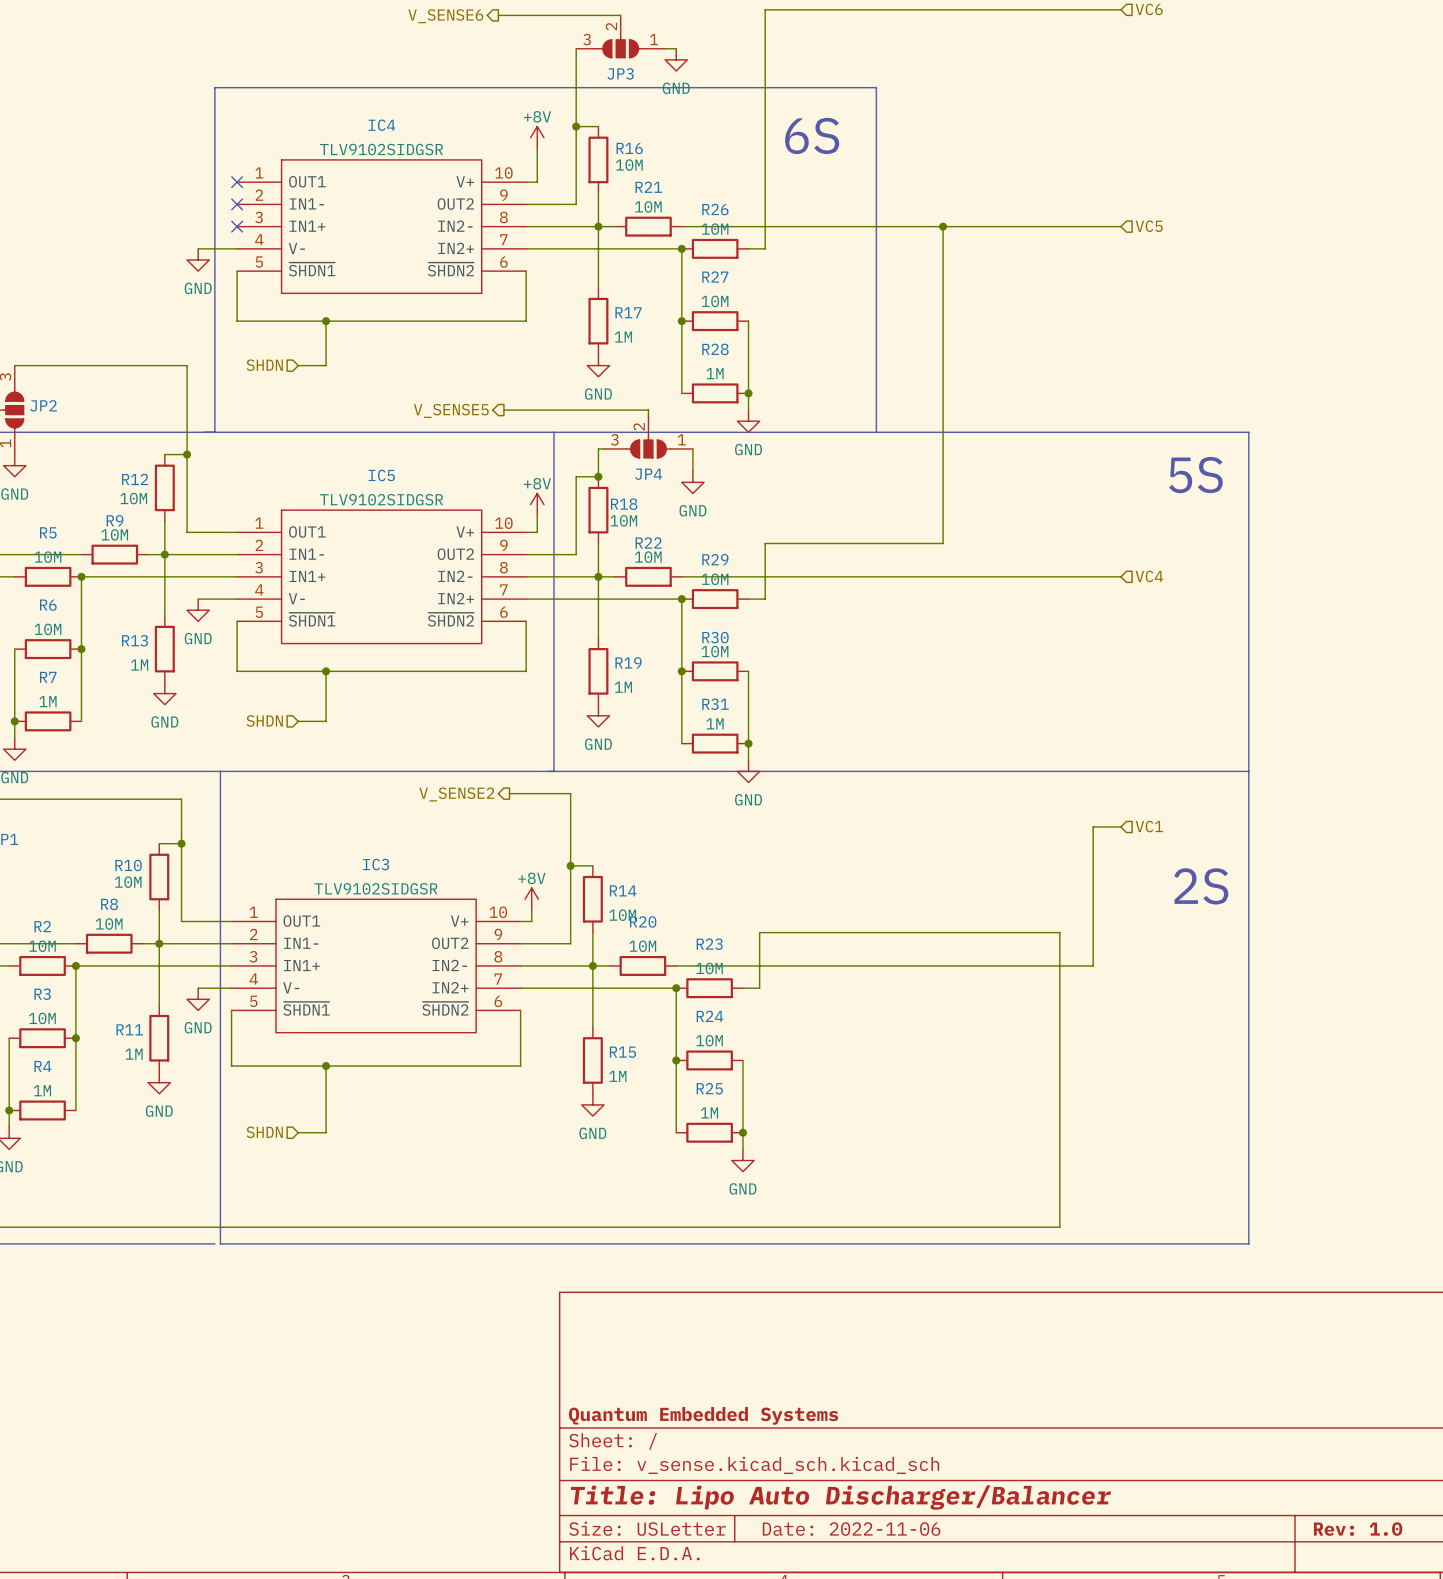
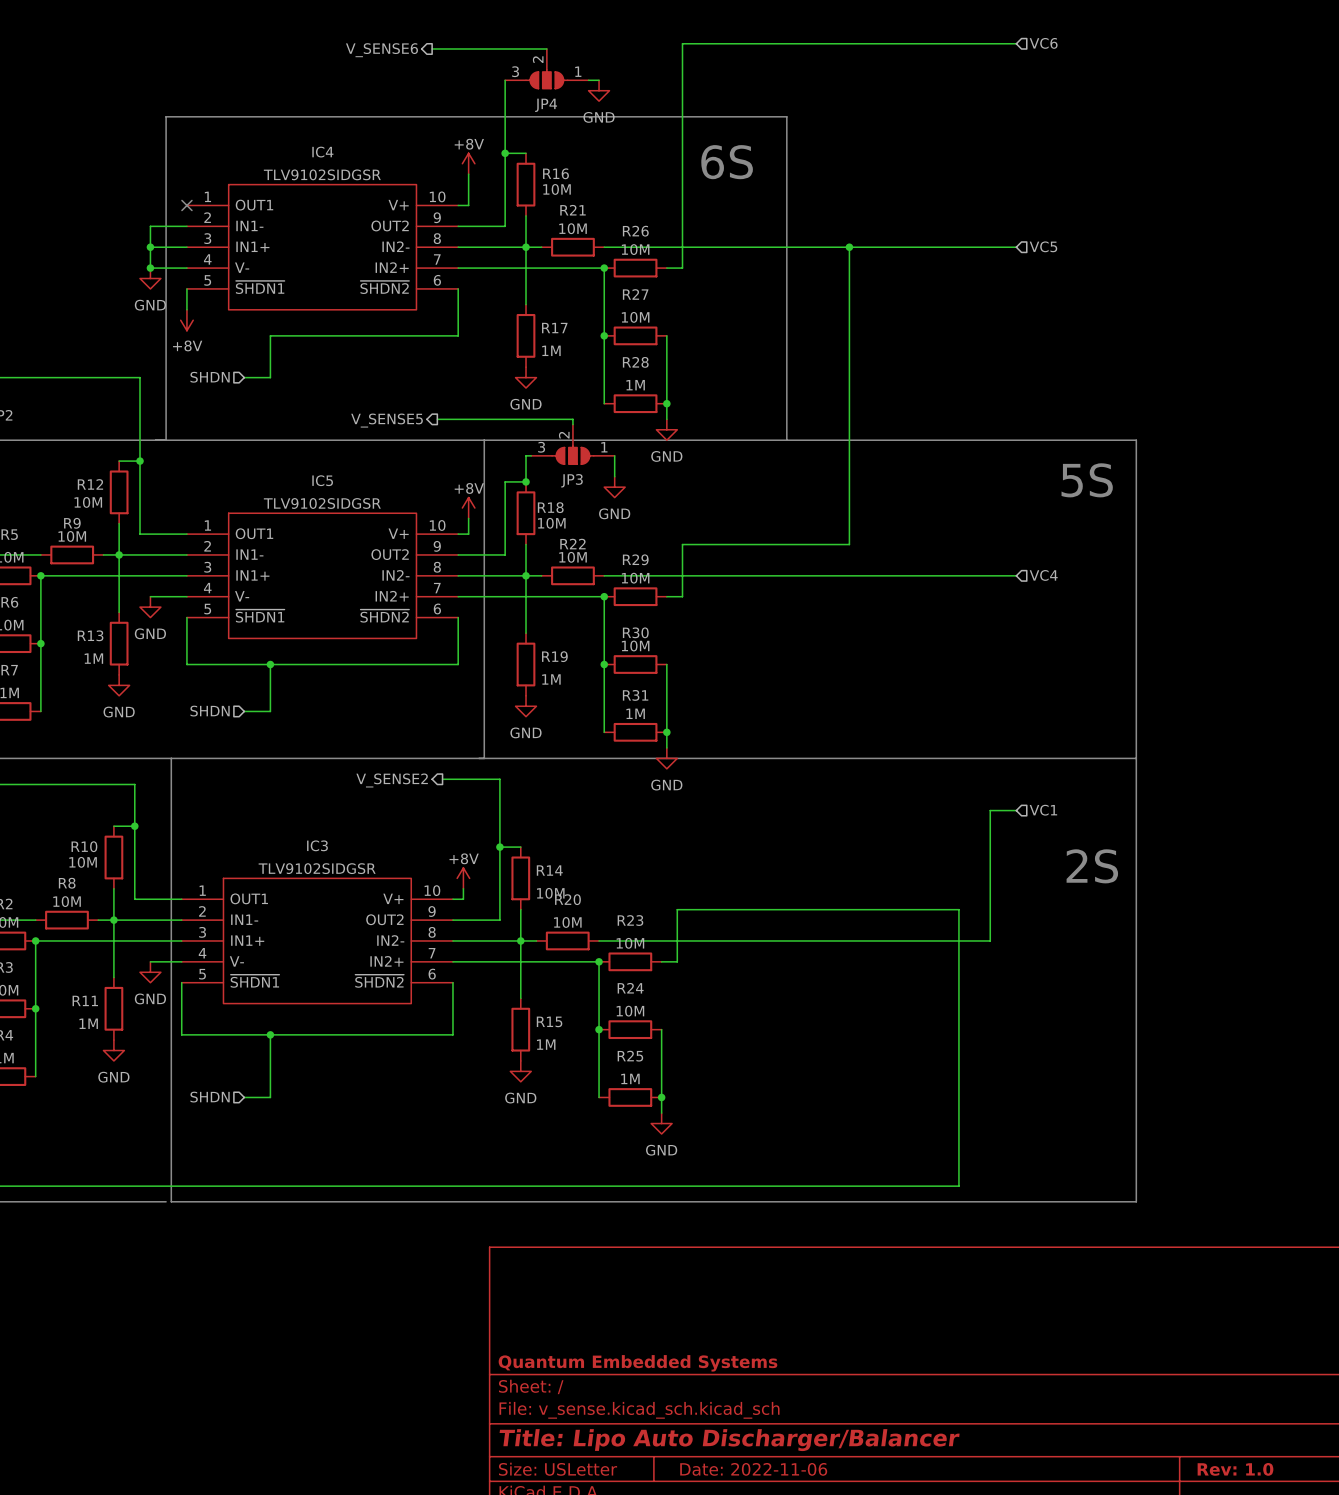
JP3 name: JP3 (620, 73) -> JP4 (546, 105)
wire: none -> (186, 226) (150, 226) (150, 268)
no-connect mark: (237, 204) -> none
wire: none -> (150, 247) (186, 247)
junction: none -> (150, 247)
no-connect mark: (237, 226) -> none
junction: none -> (150, 268)
wire: (237, 293) (237, 321) (326, 321) -> none
power symbol: none -> +8V (186, 320)
junction: (326, 321) -> none
JP4 name: JP4 (648, 474) -> JP3 (572, 480)

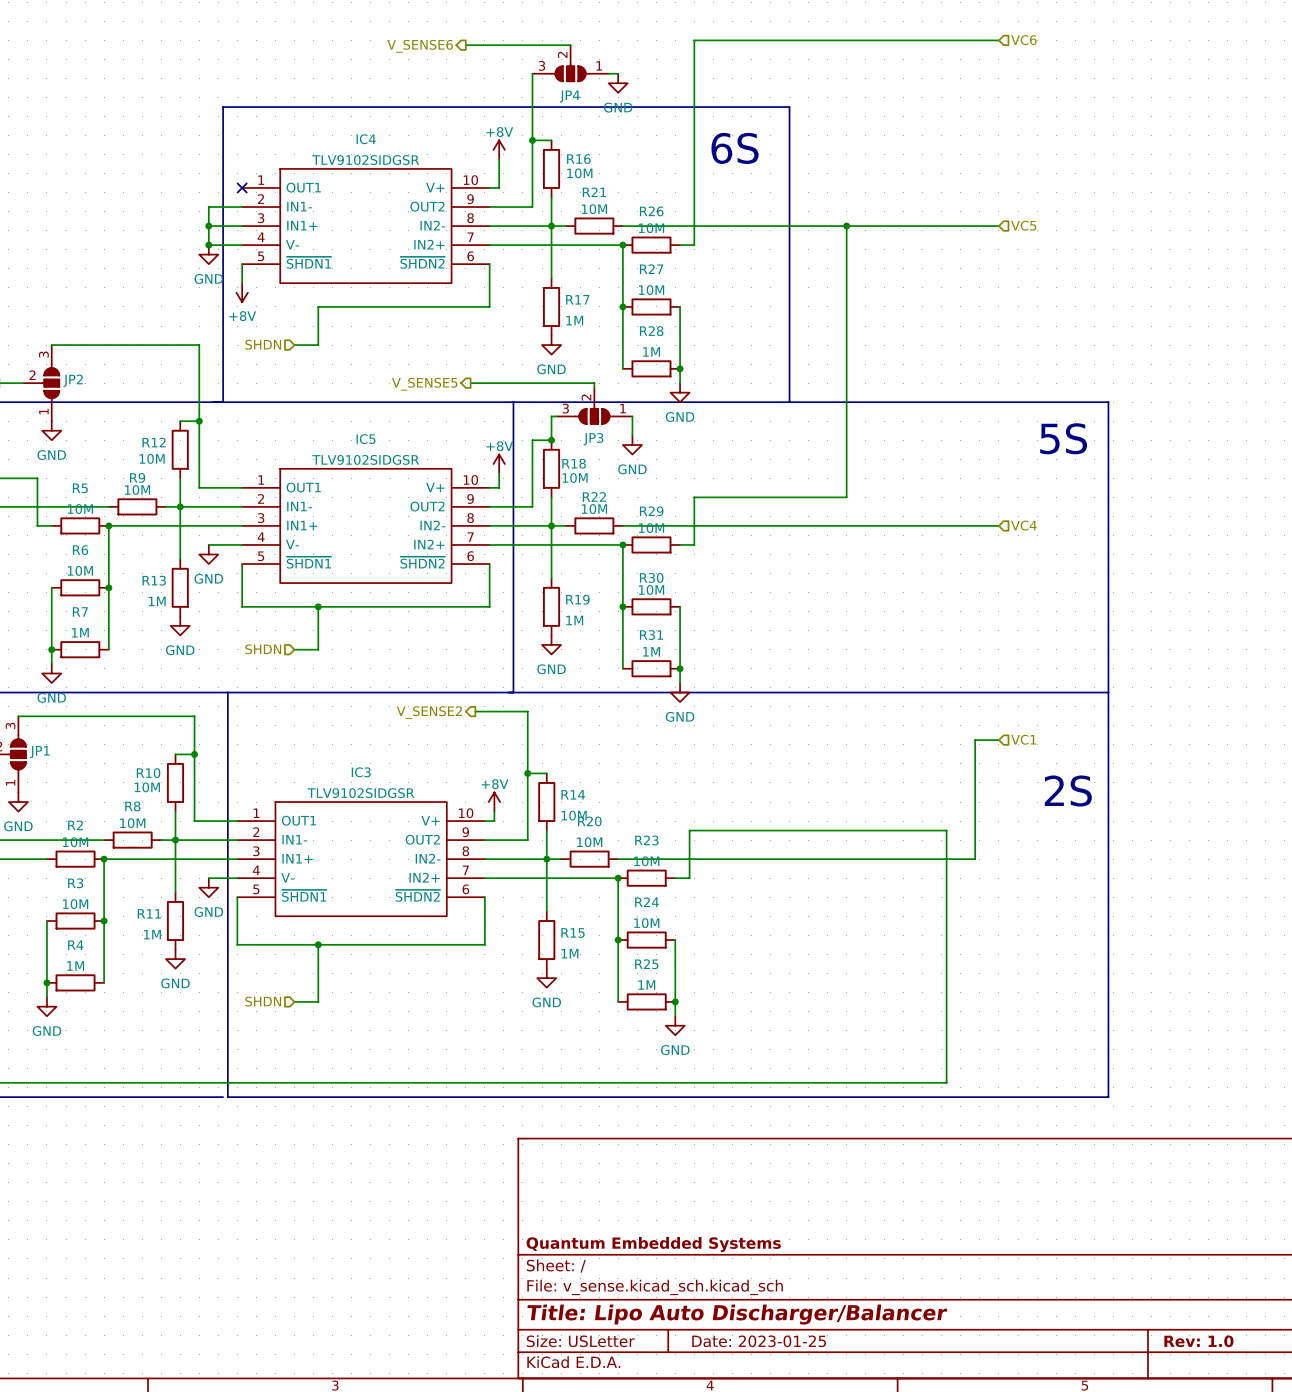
title block: Date: 2022-11-06 (753, 1469) -> Date: 2023-01-25 (759, 1341)

